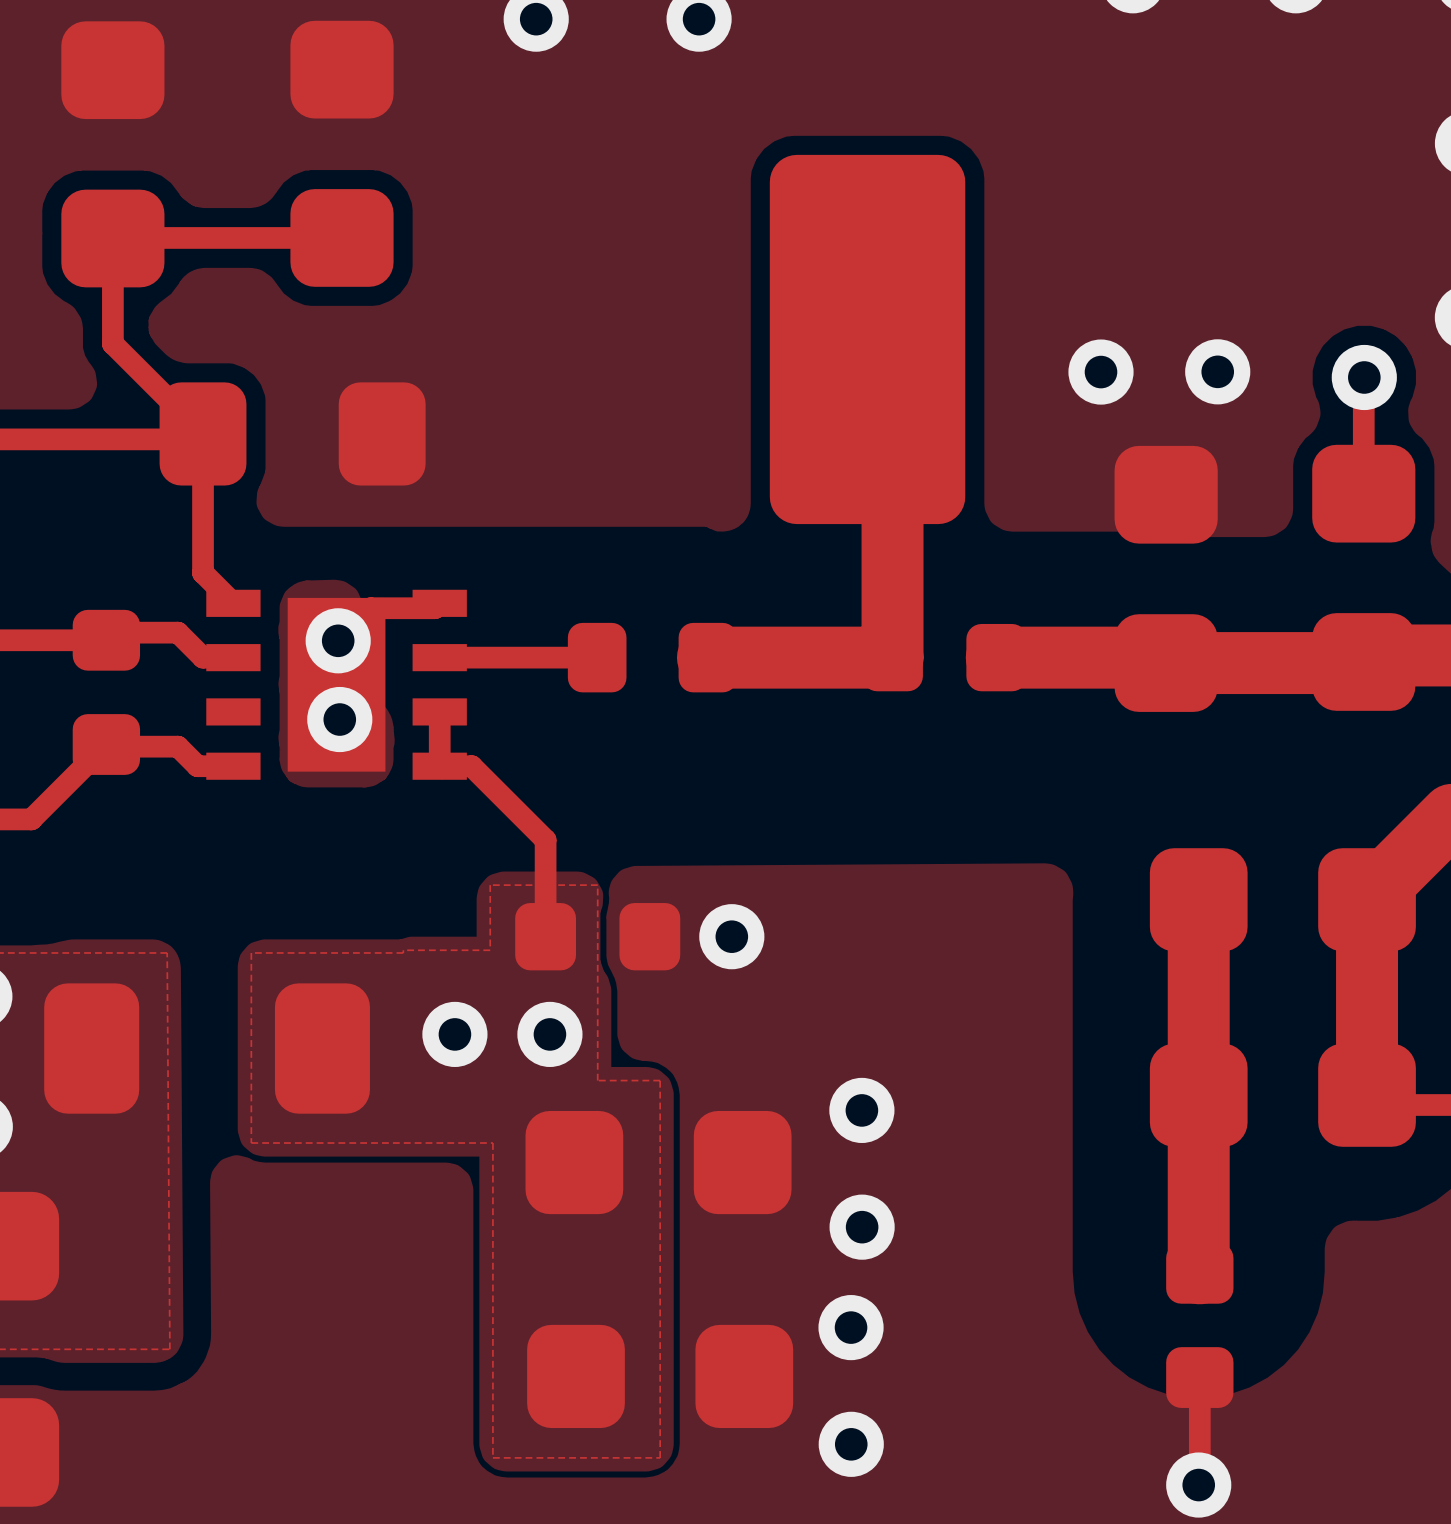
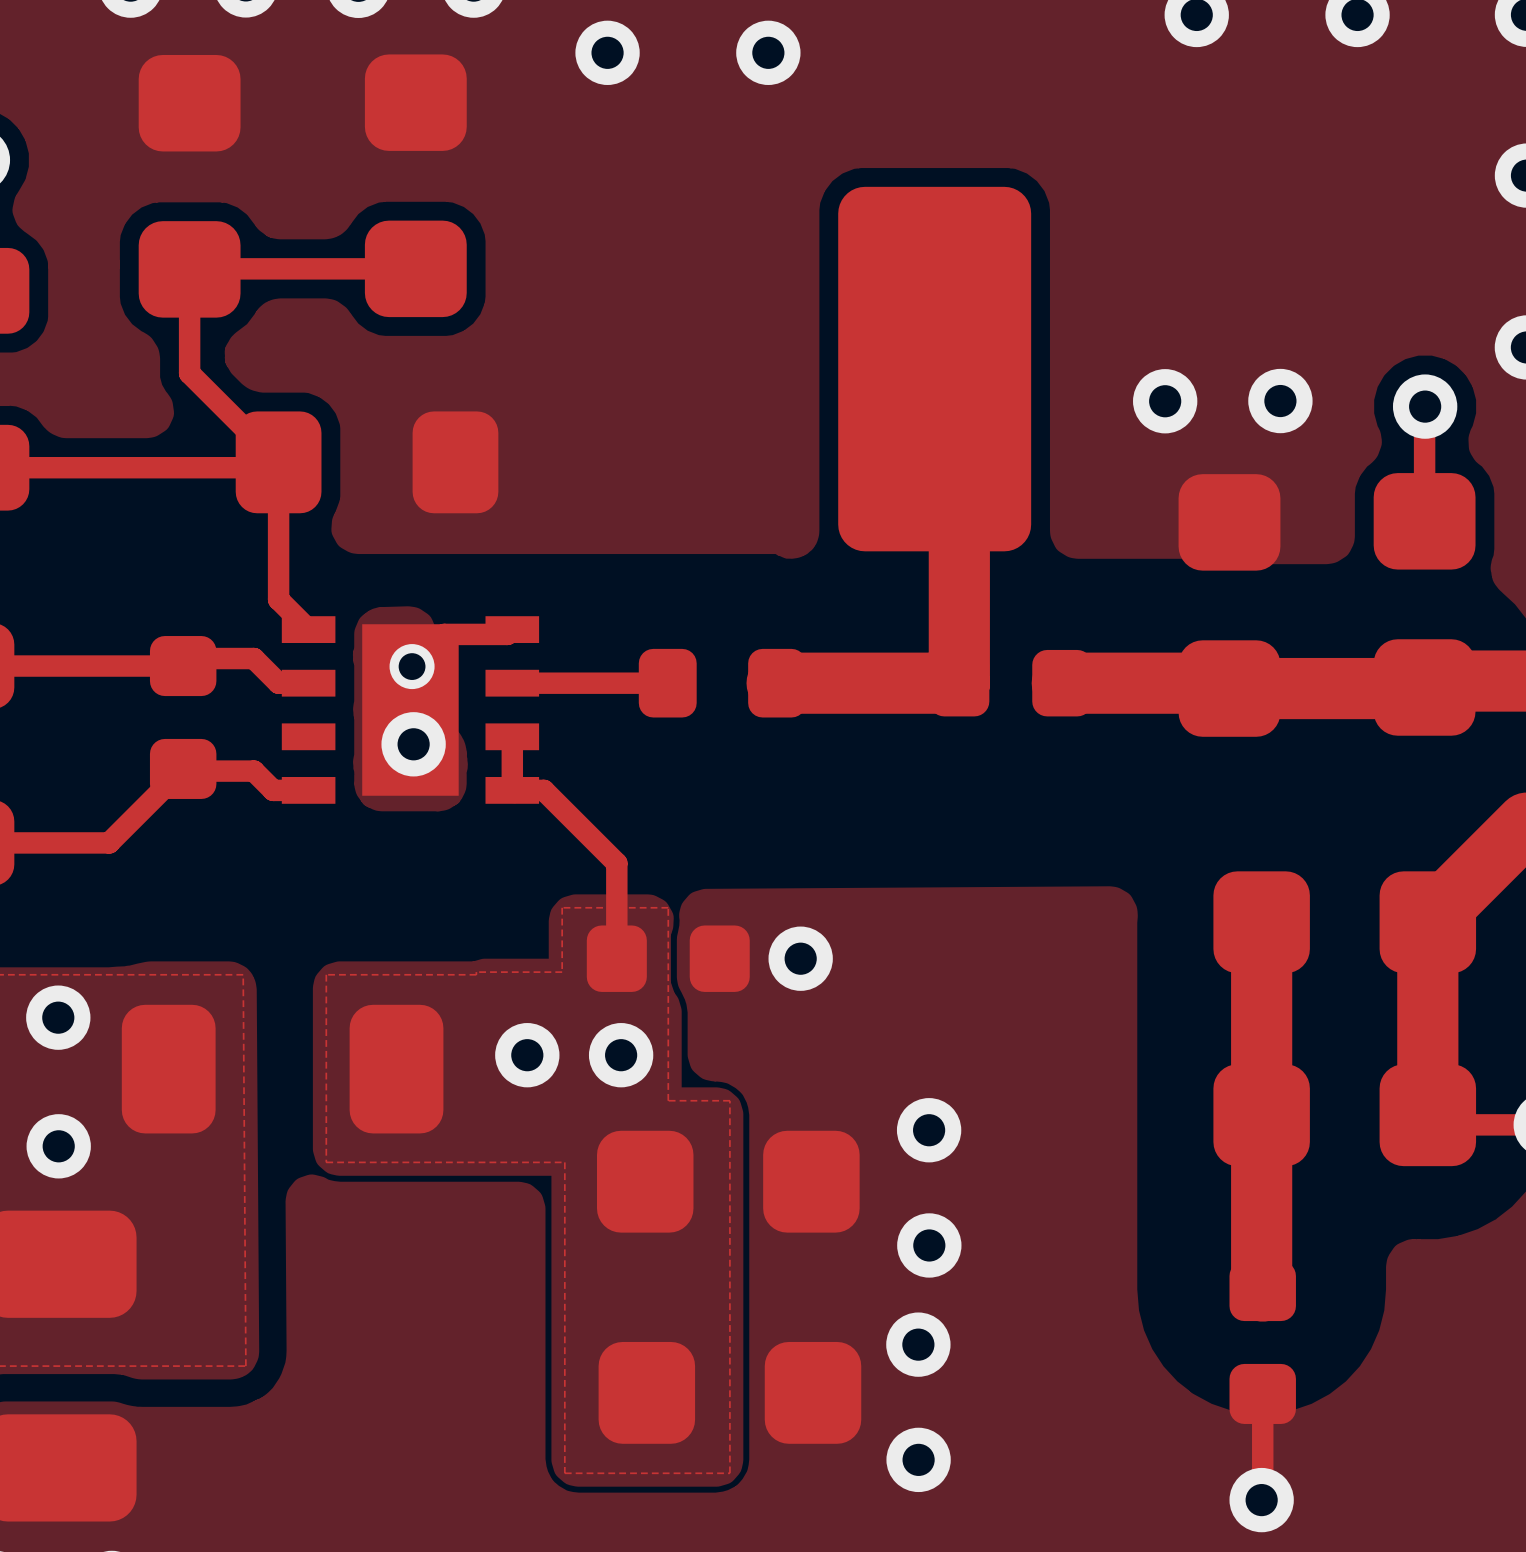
via size: [305, 608, 371, 674] -> [389, 644, 435, 690]

